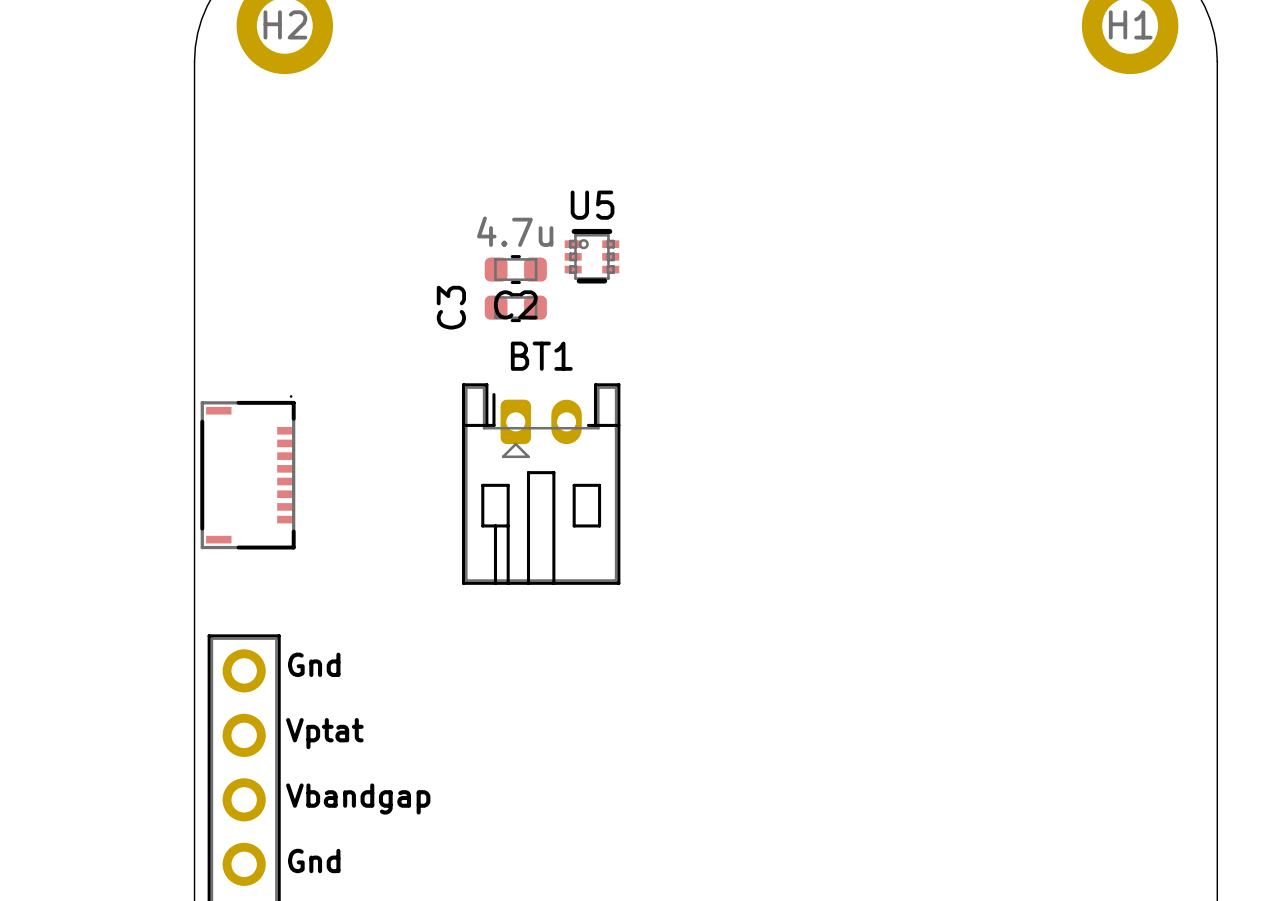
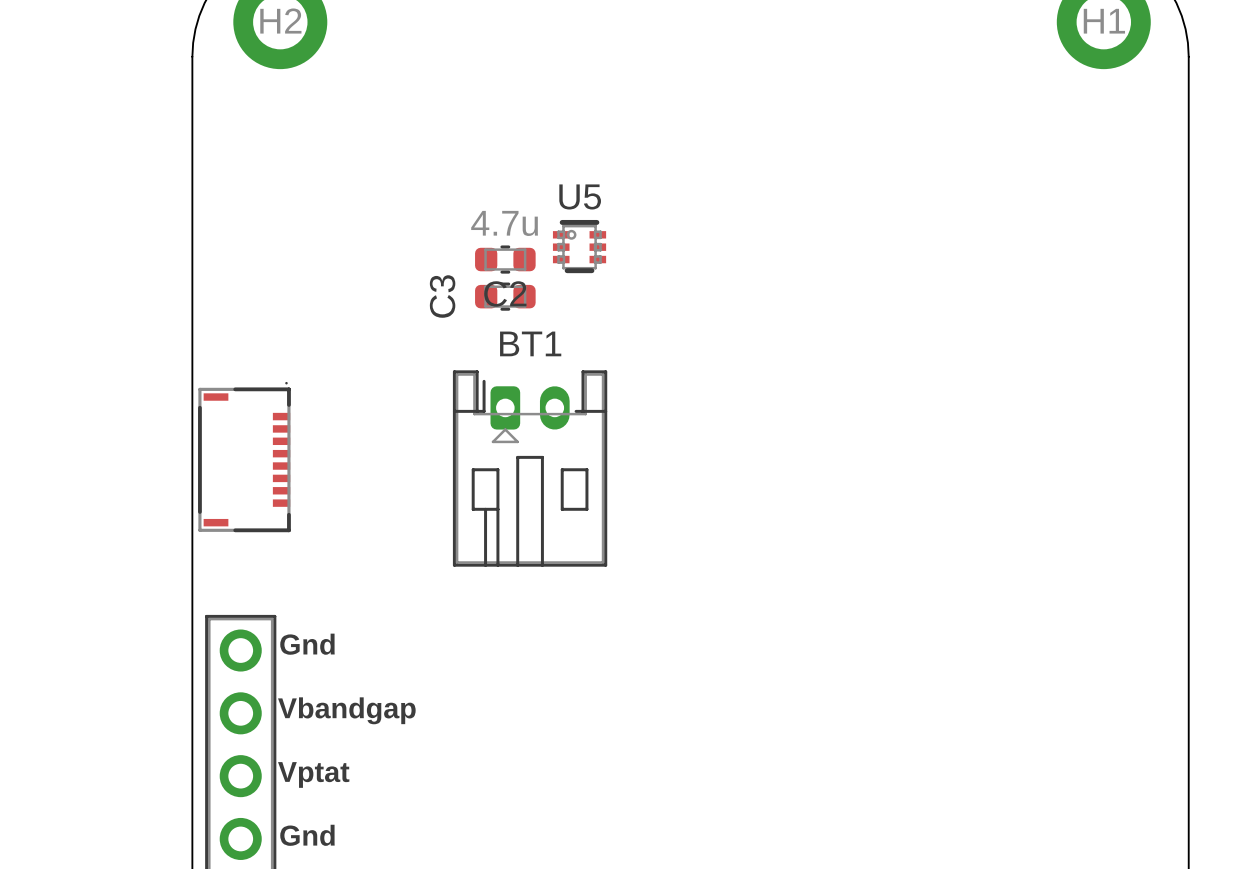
text: Vptat (324, 733) -> Vbandgap (346, 710)
text: Vbandgap (358, 798) -> Vptat (313, 774)

